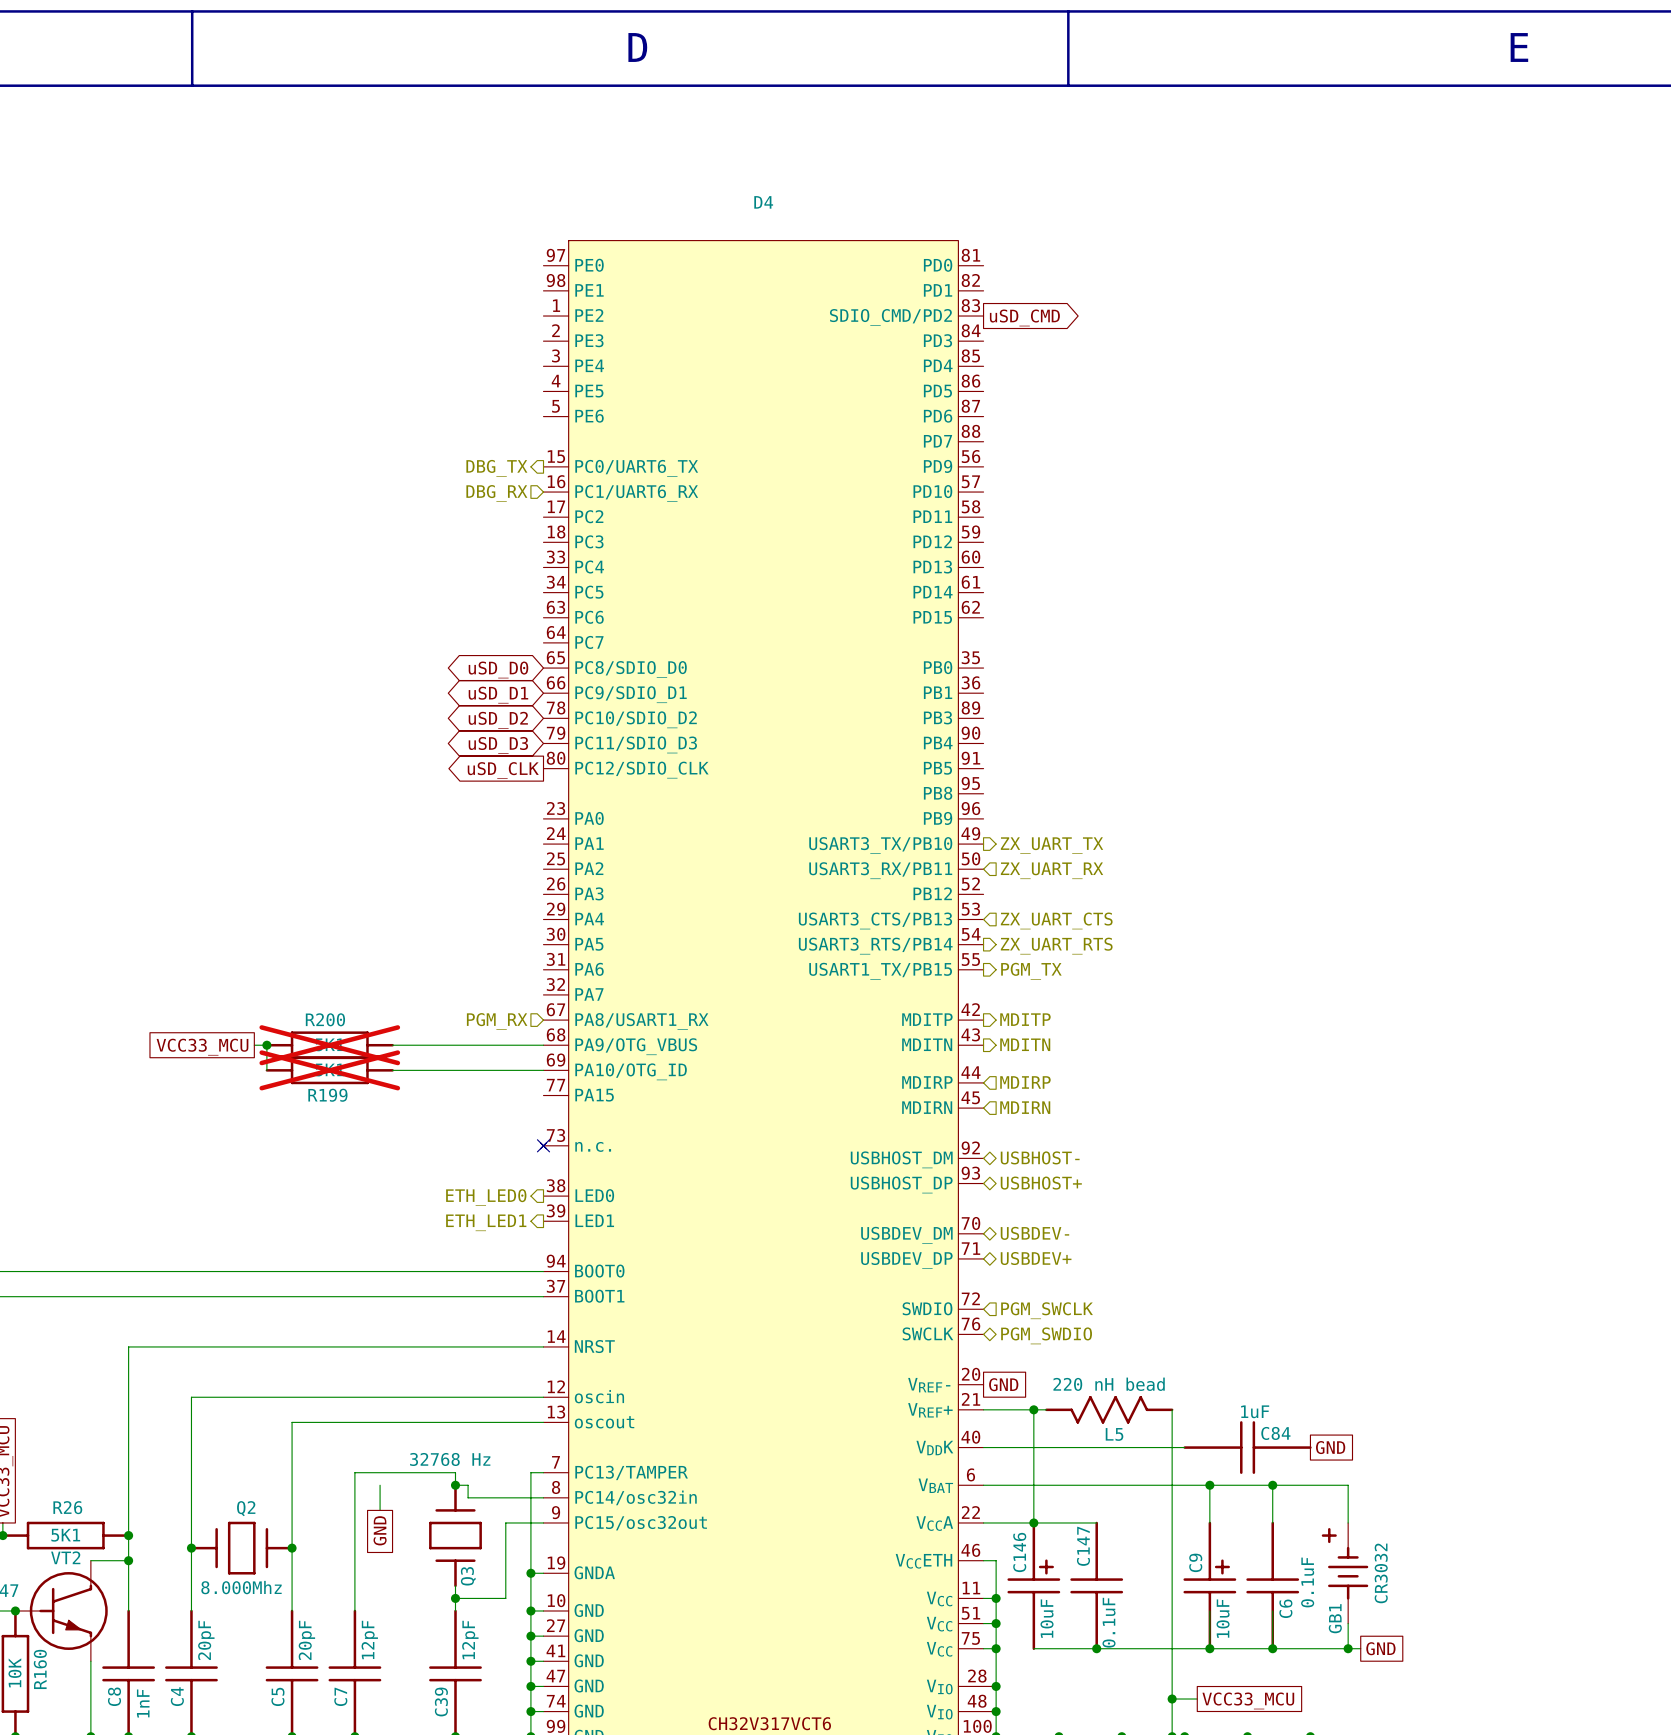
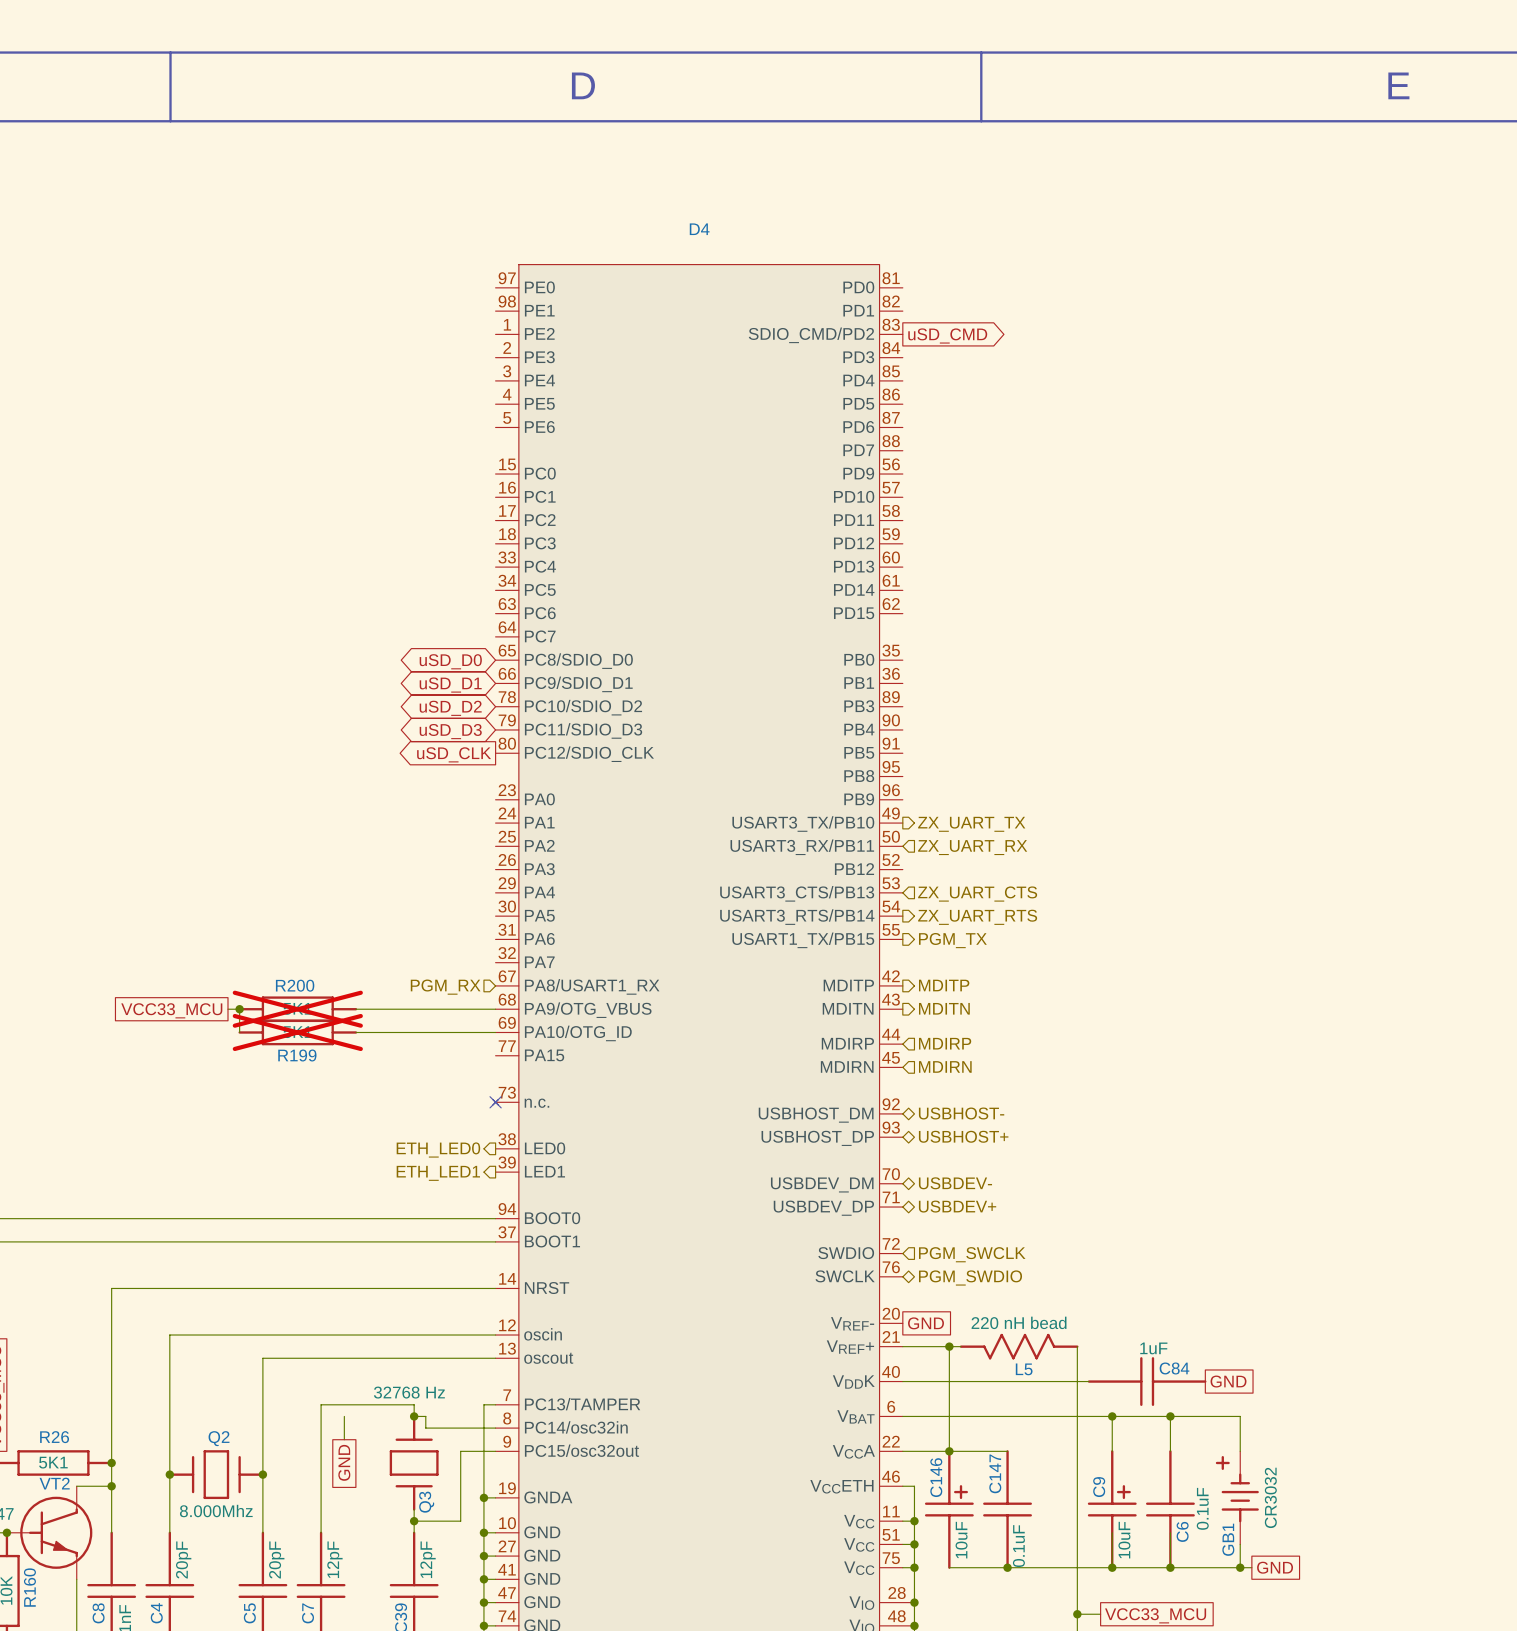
hierarchical label: DBG_TX (496, 468) -> none
D4 pin name: PC0/UART6_TX (636, 468) -> PC0 (540, 473)
hierarchical label: DBG_RX (496, 493) -> none
D4 pin name: PC1/UART6_RX (636, 493) -> PC1 (540, 496)

